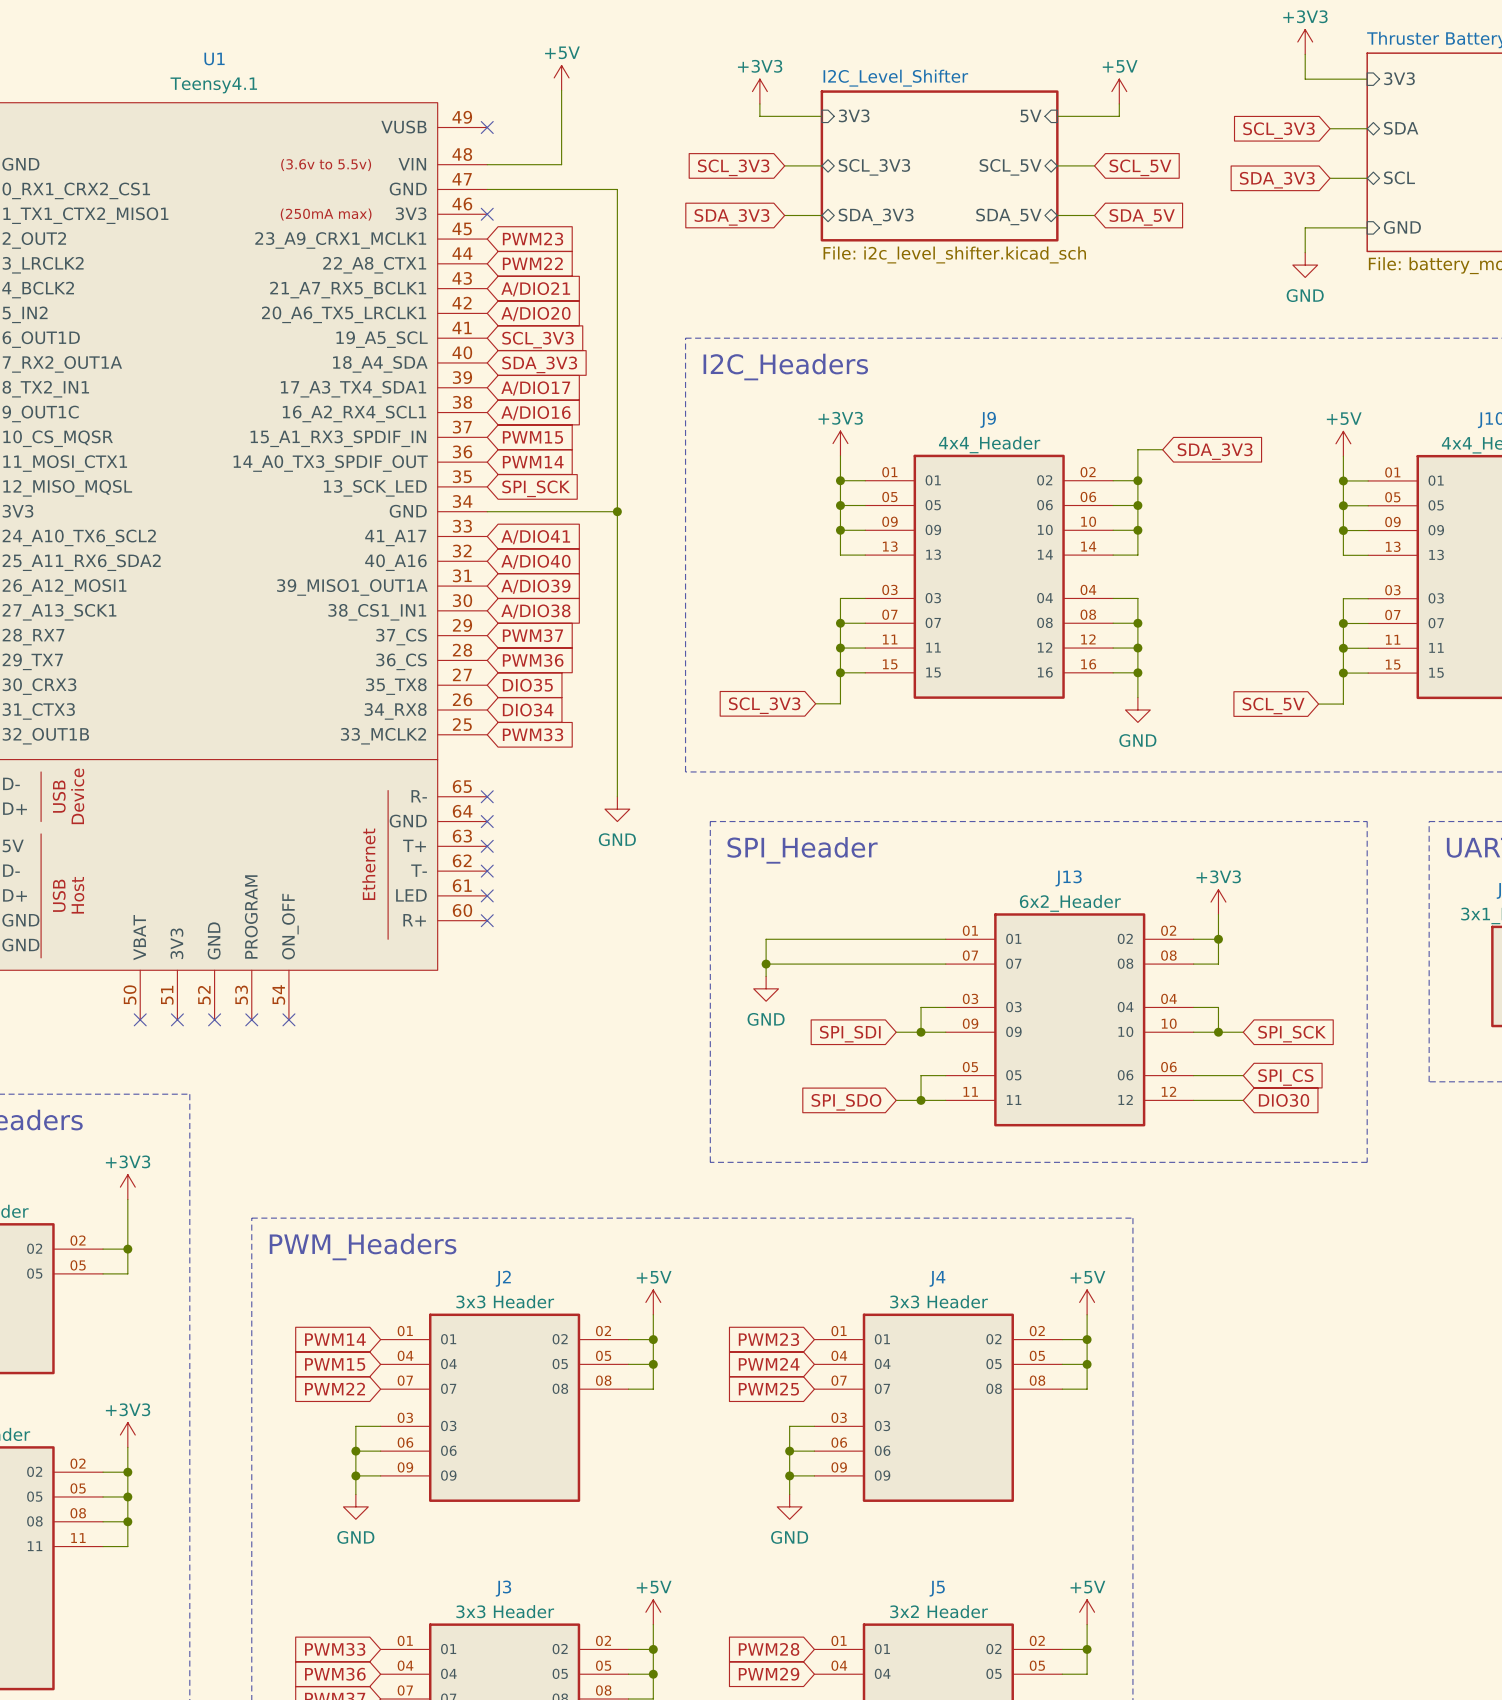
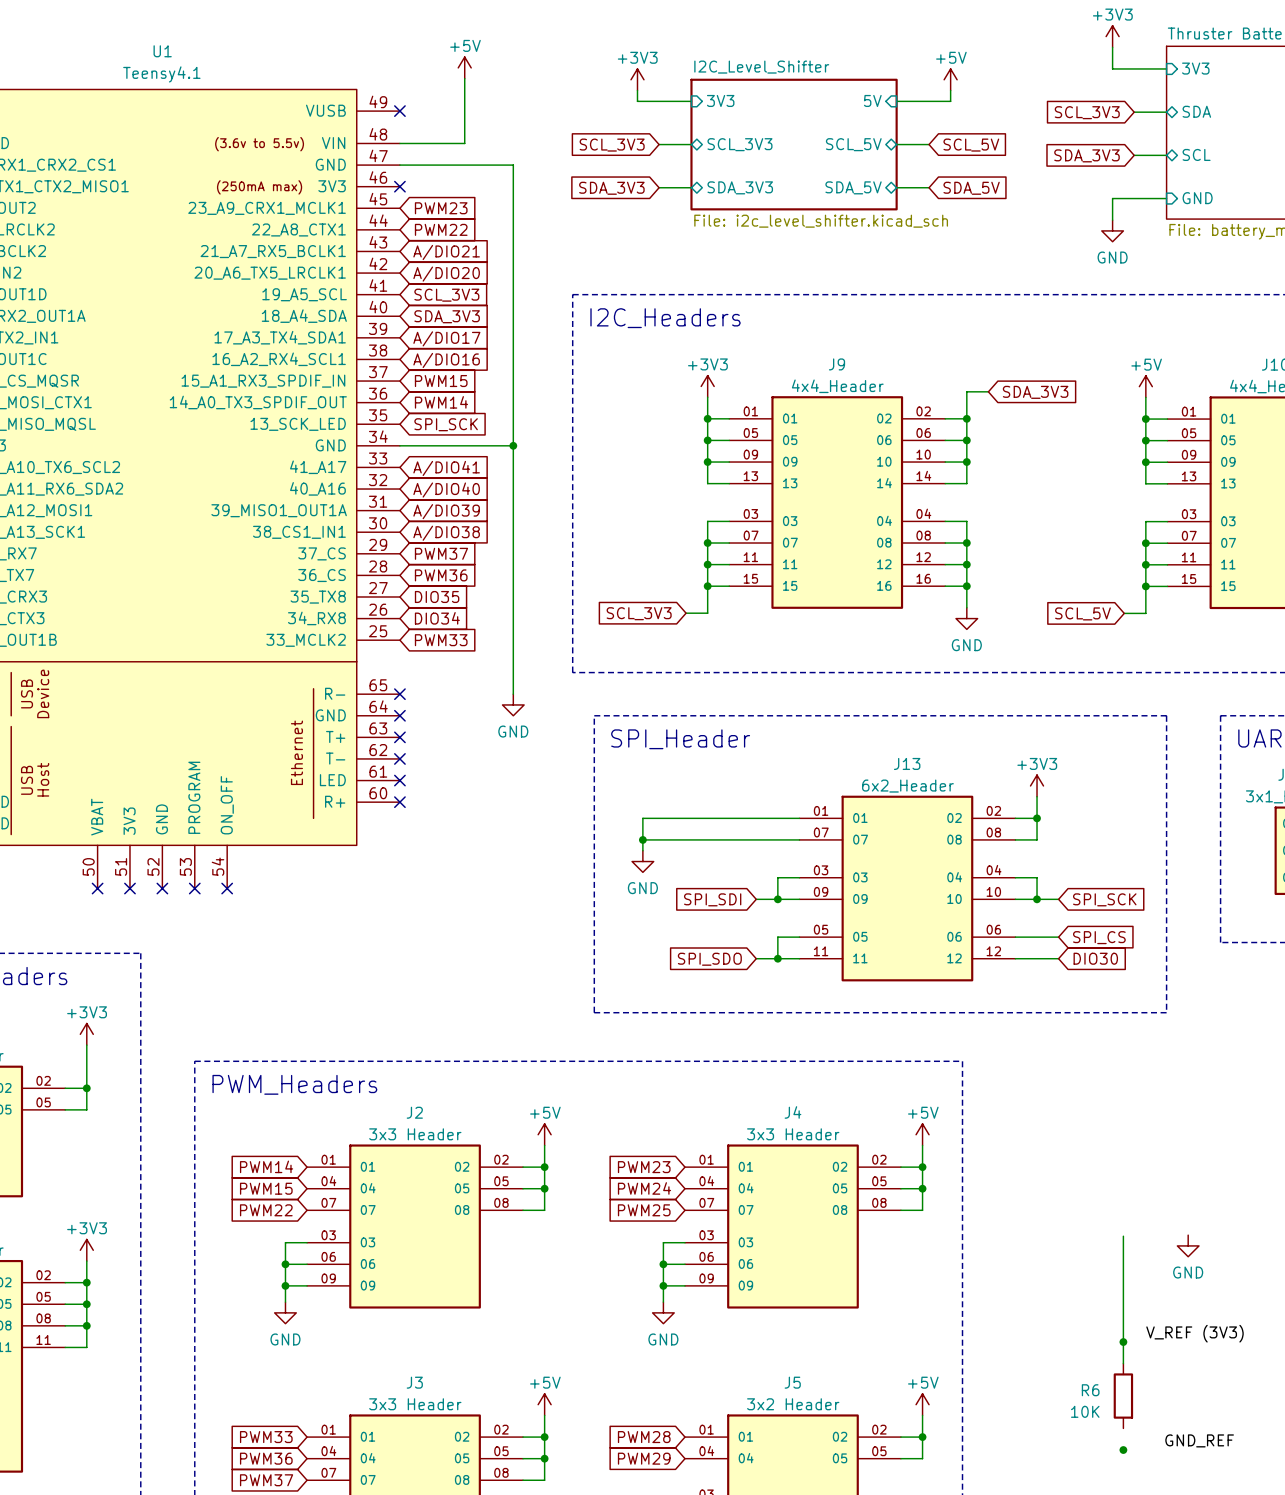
wire: none -> (1123, 1236) (1123, 1363)
power symbol: none -> GND (1188, 1245)
label: none -> V_REF (3V3) (1194, 1333)
junction: none -> (1123, 1342)
R6: none -> 10K (1123, 1396)
label: none -> GND_REF (1199, 1440)
junction: none -> (1123, 1450)

